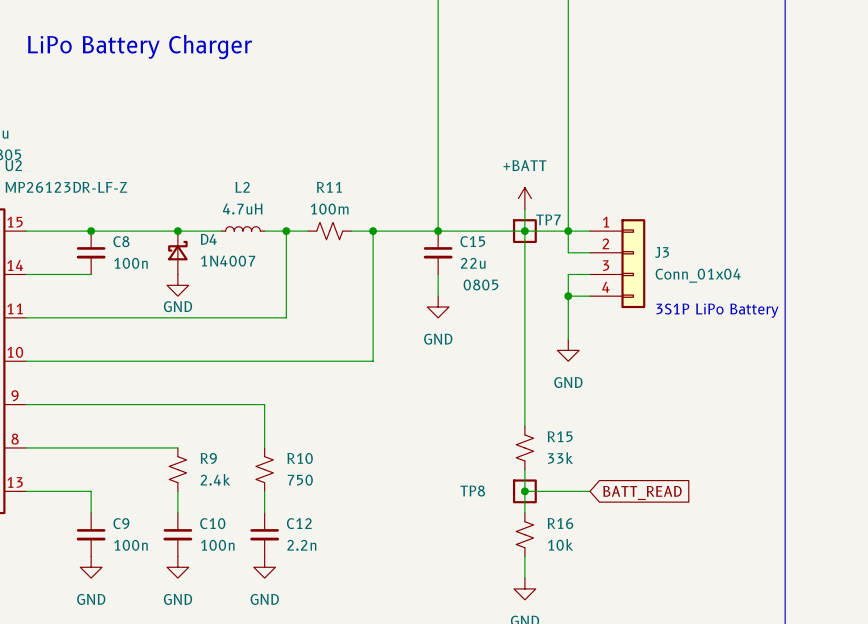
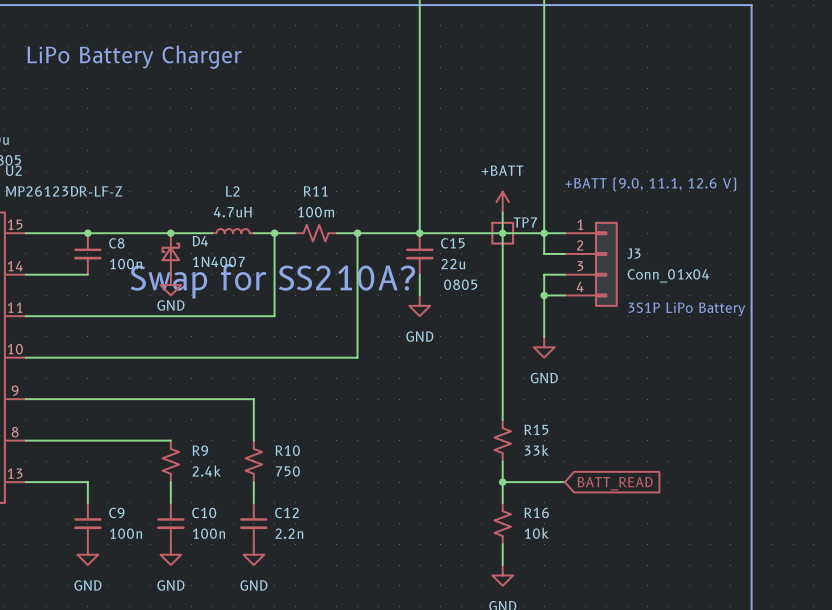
text: none -> +BATT (9.0, 11.1, 12.6 V) (650, 184)
text: none -> Swap for SS210A? (272, 281)
TP8: (524, 491) -> none

